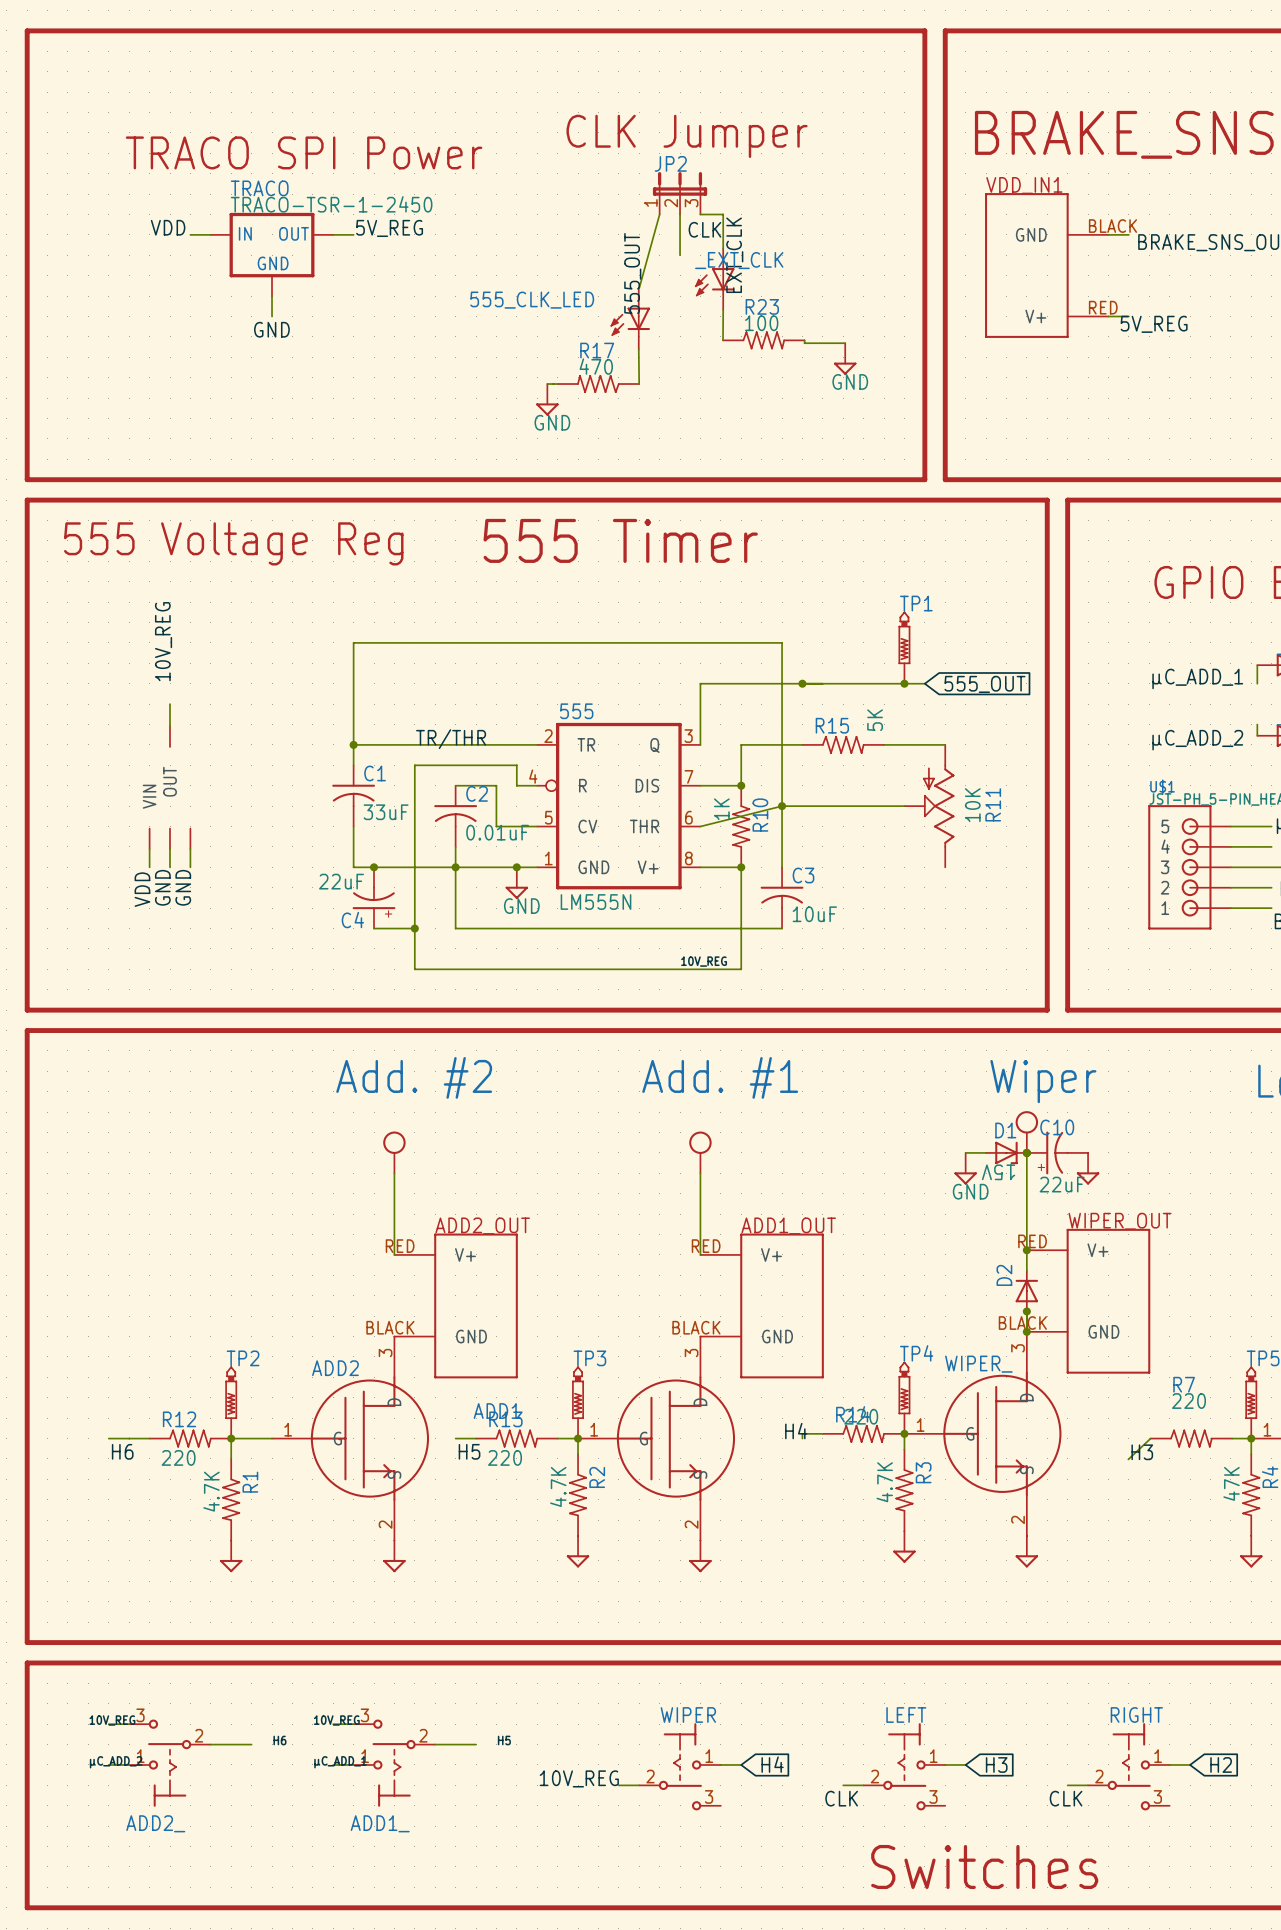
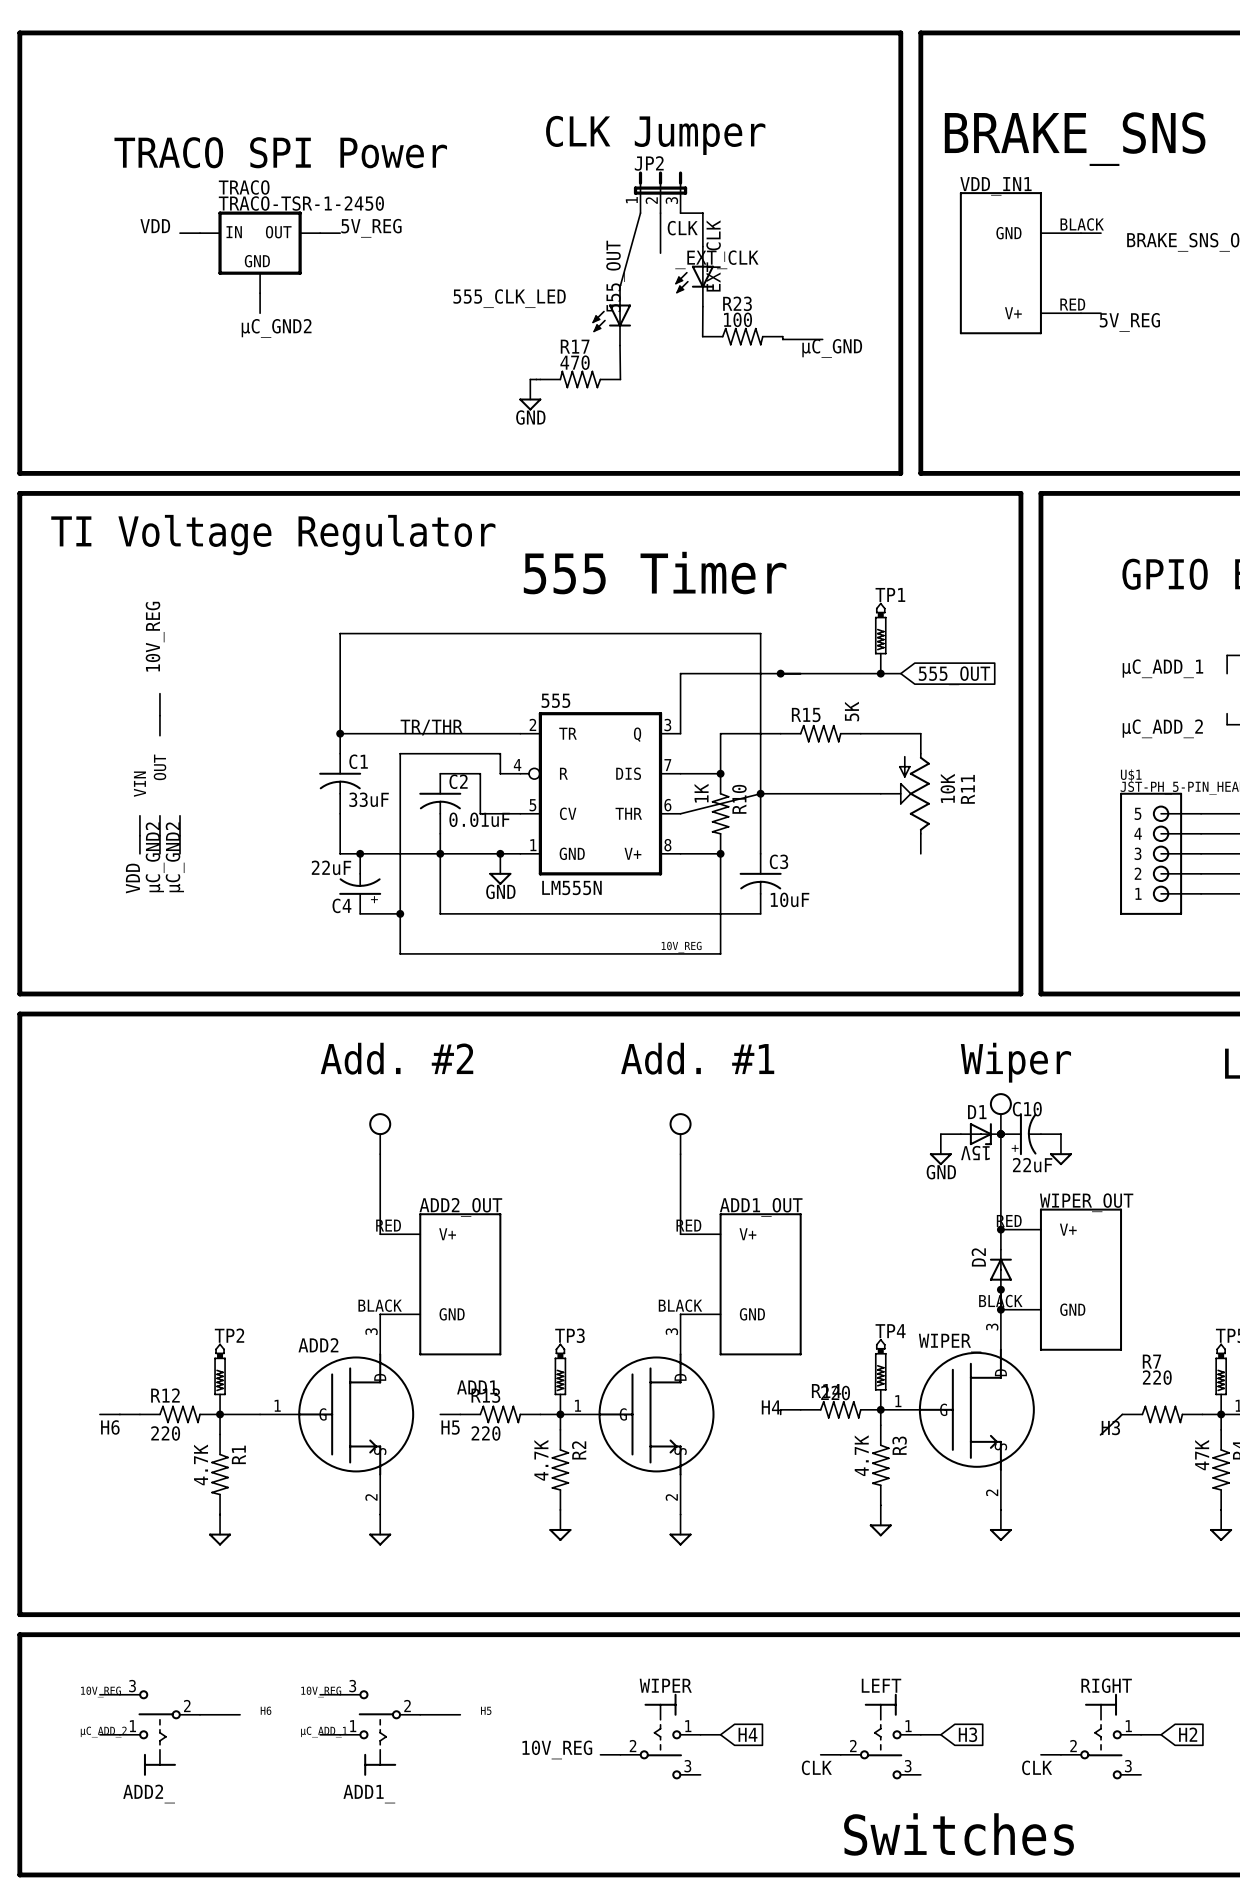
label: GND (271, 329) -> µC_GND2 (276, 328)
label: none -> µC_GND (832, 348)
power symbol: GND (845, 359) -> none
text position: 555 Timer (620, 540) -> 555 Timer (655, 573)
text: 555 Voltage Reg (233, 543) -> TI Voltage Regulator (273, 535)
label: GND (162, 887) -> µC_GND2 (155, 857)
label: GND (183, 887) -> µC_GND2 (175, 857)

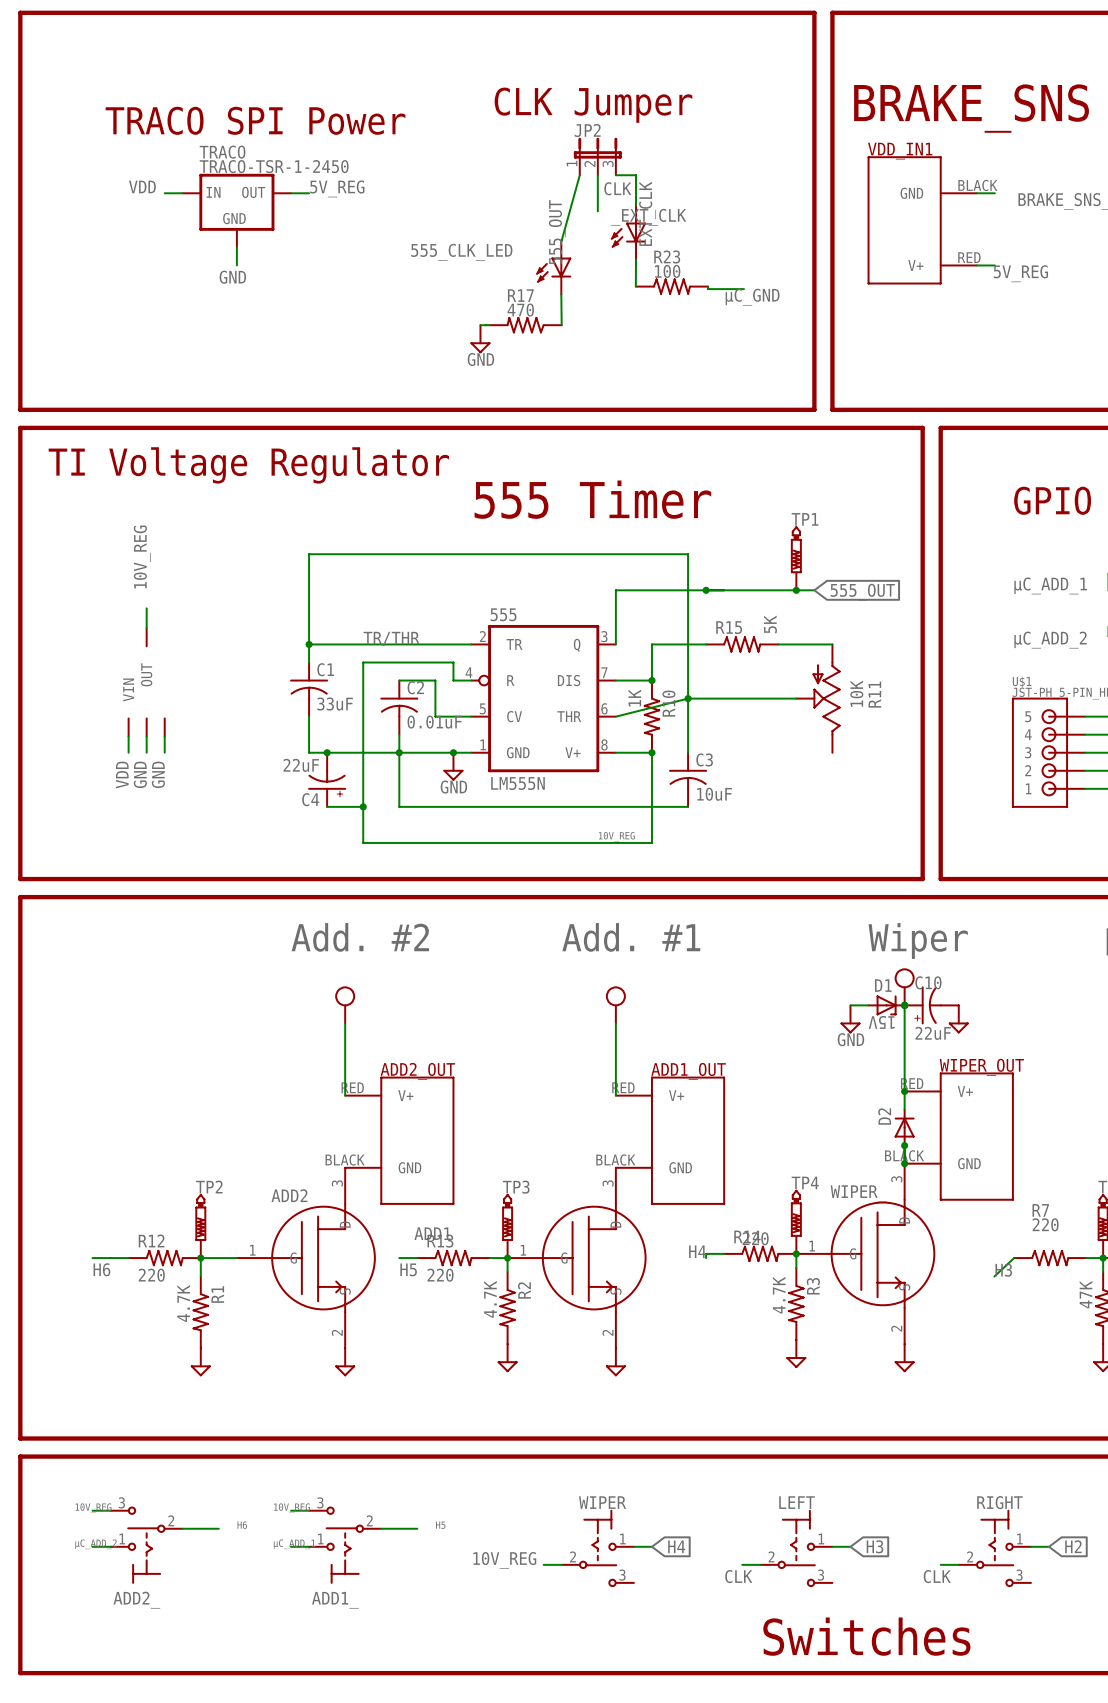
label: µC_GND2 (276, 328) -> GND (232, 277)
label: µC_GND2 (155, 857) -> GND (140, 774)
label: µC_GND2 (175, 857) -> GND (158, 774)

